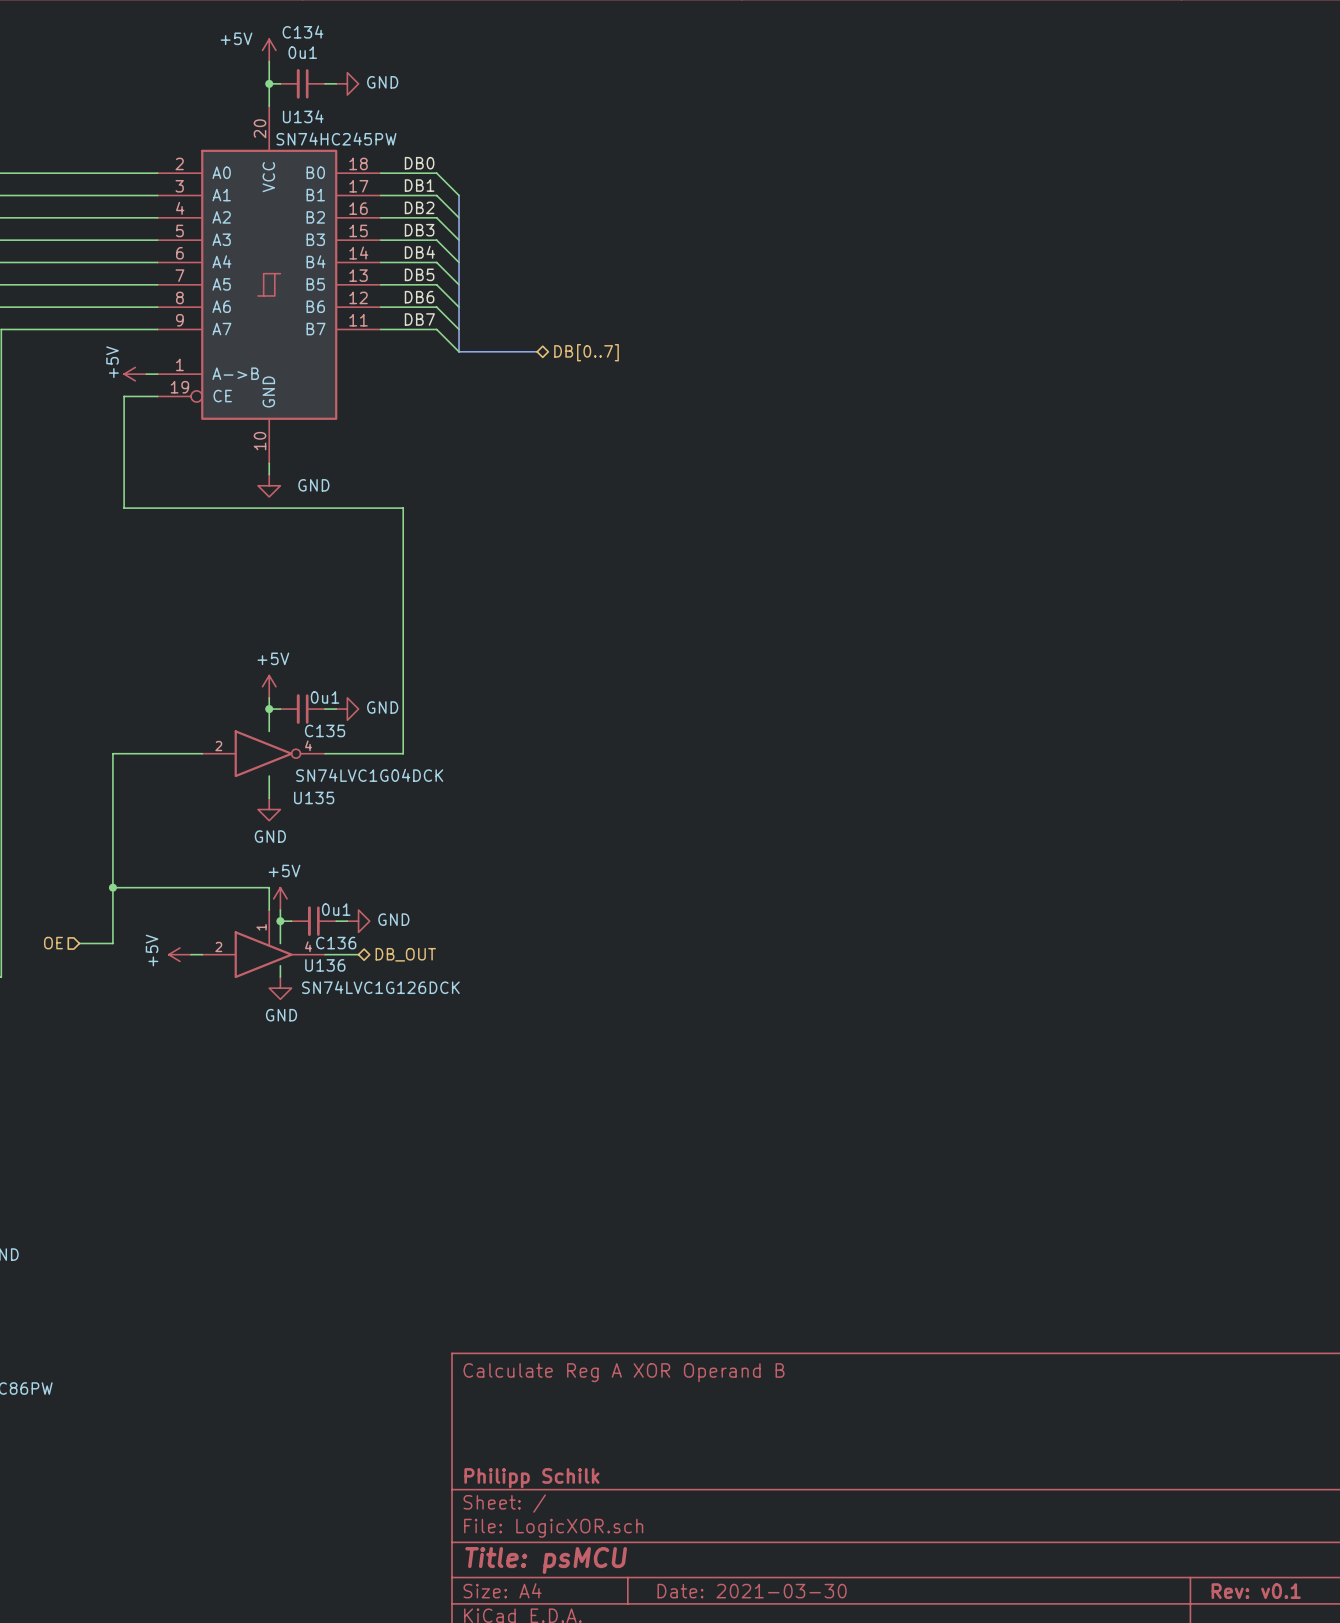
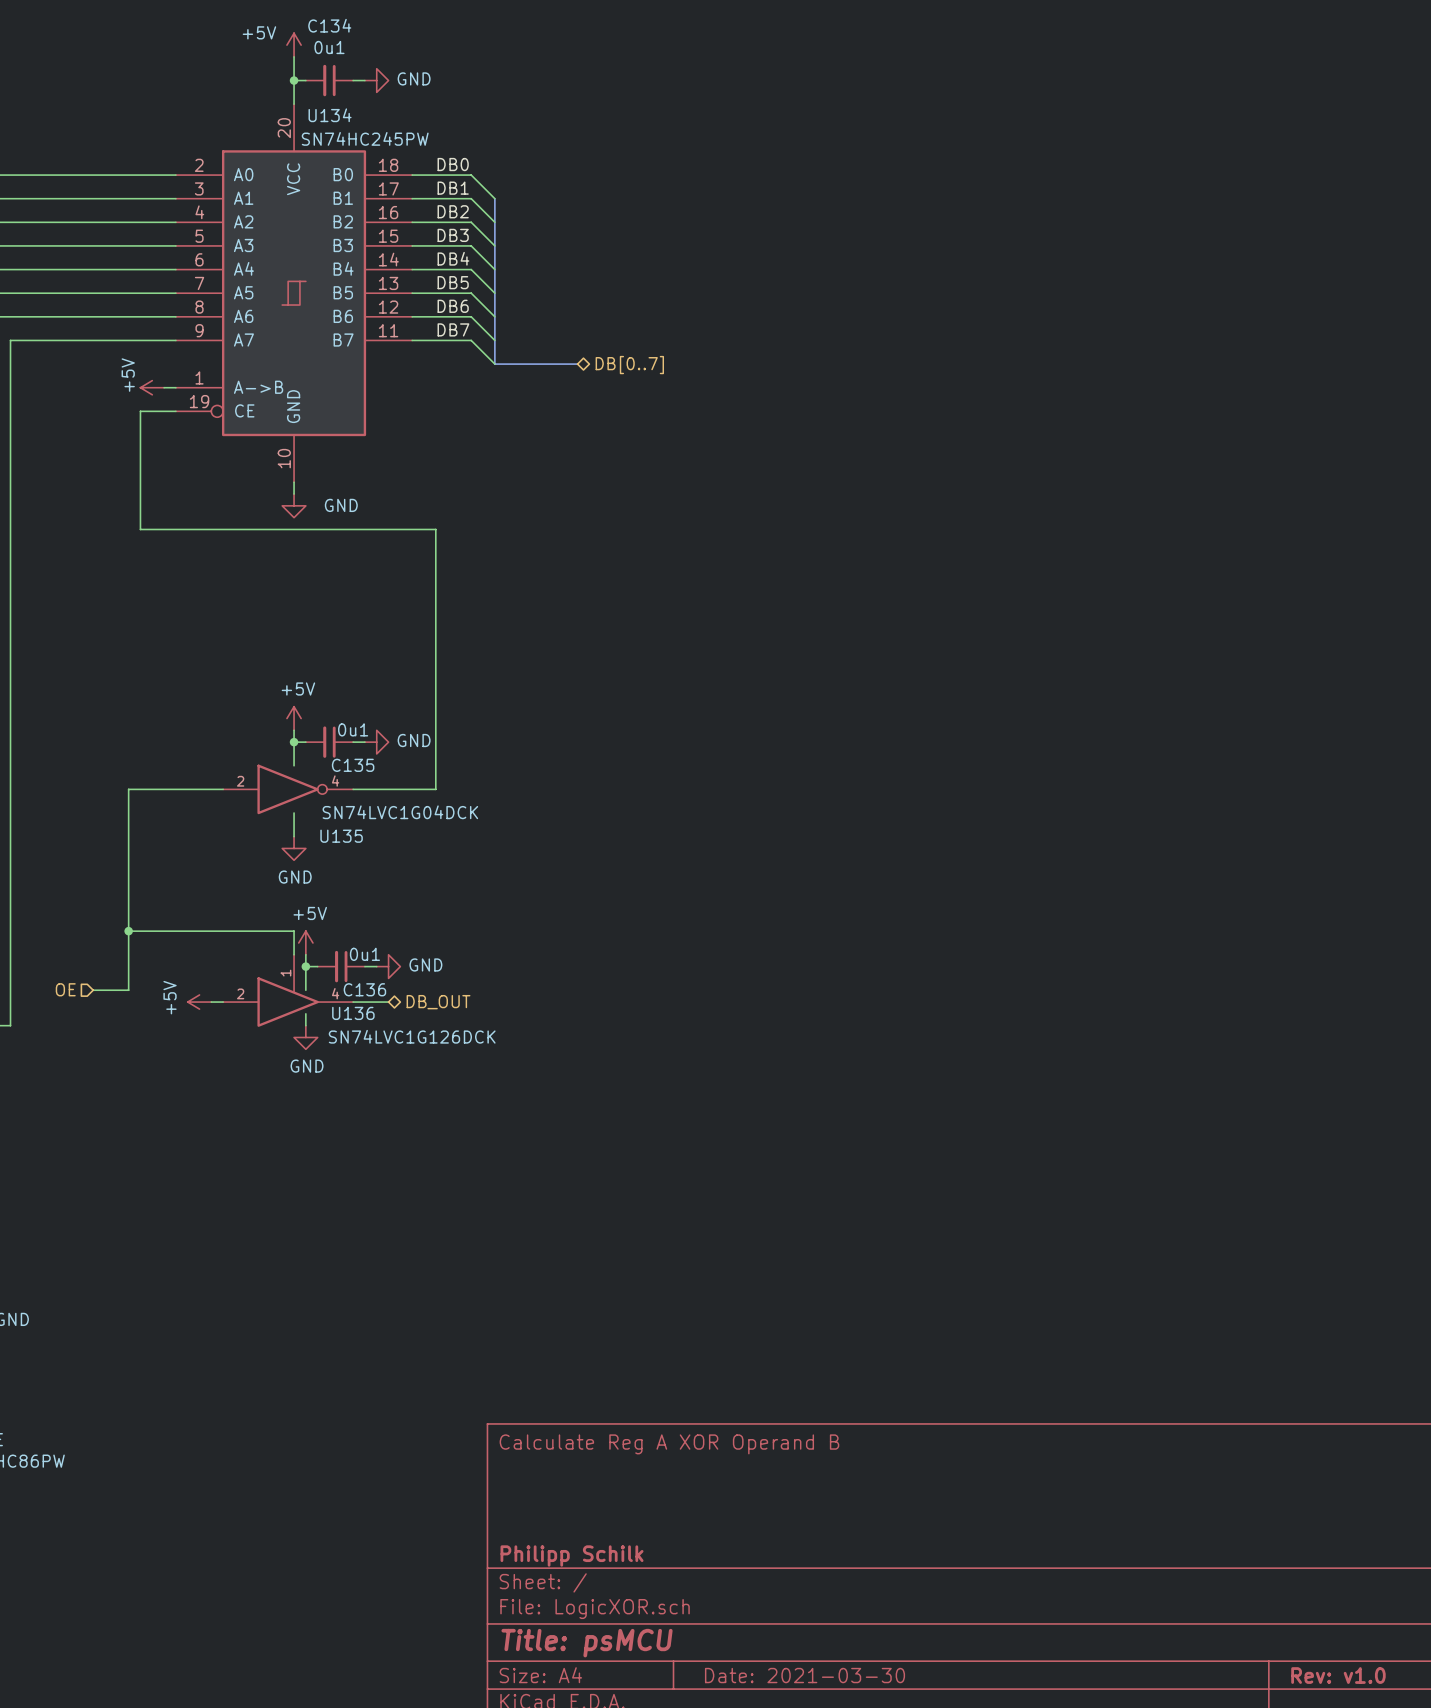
title block: Rev: v0.1 (1256, 1591) -> Rev: v1.0 (1338, 1675)

